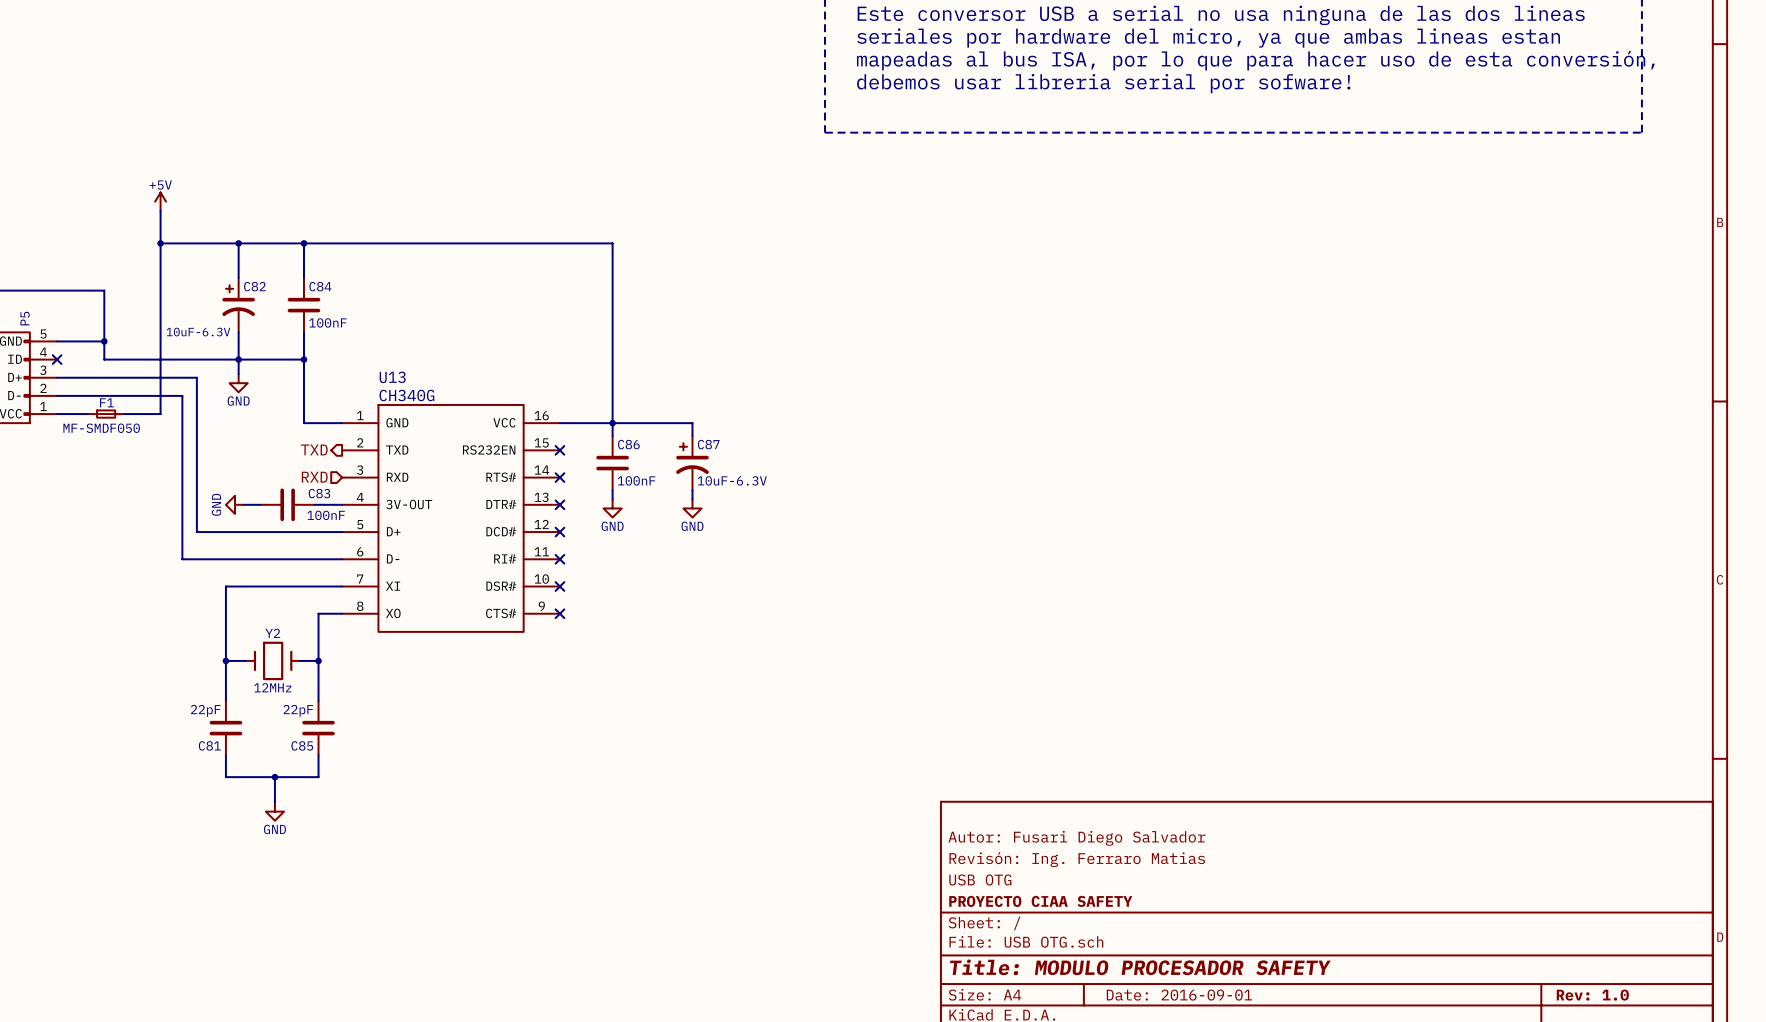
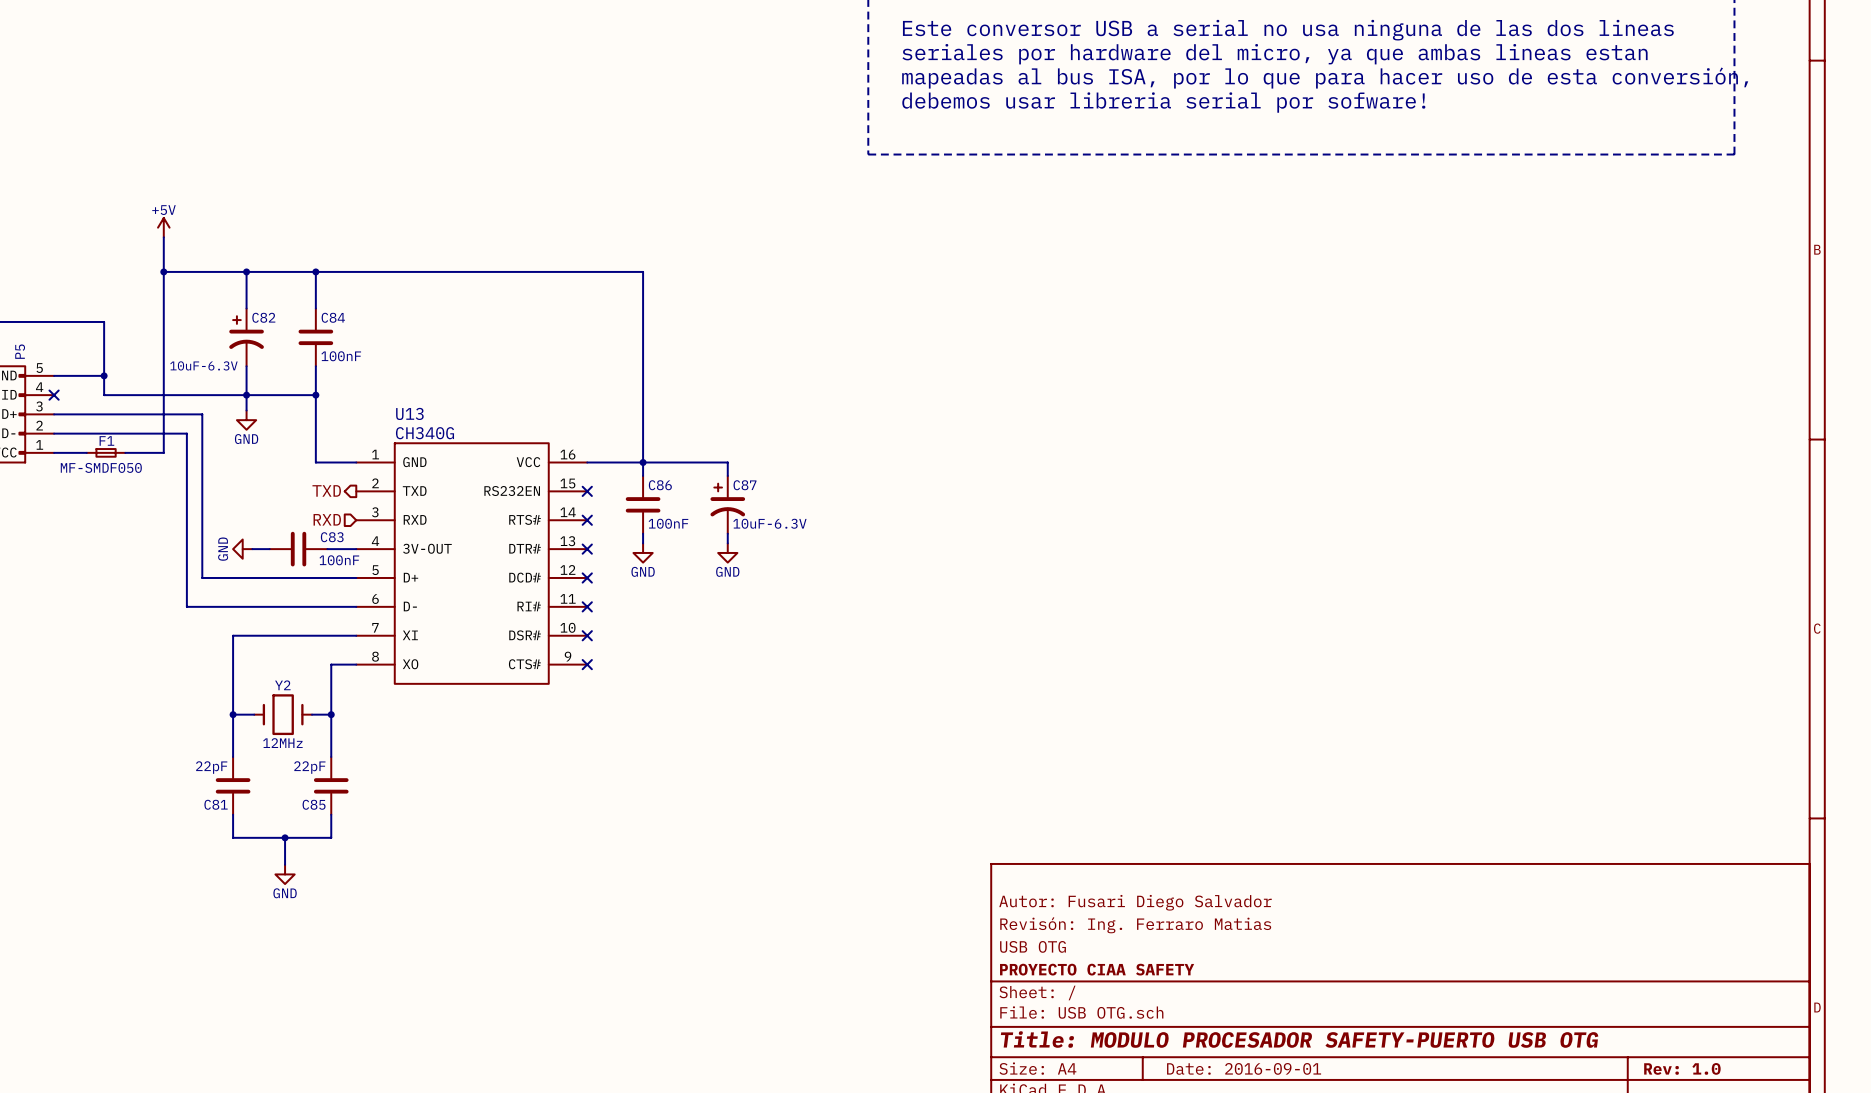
title block: Title: MODULO PROCESADOR SAFETY (1140, 967) -> Title: MODULO PROCESADOR SAFETY-PUERTO USB OTG (1299, 1039)

